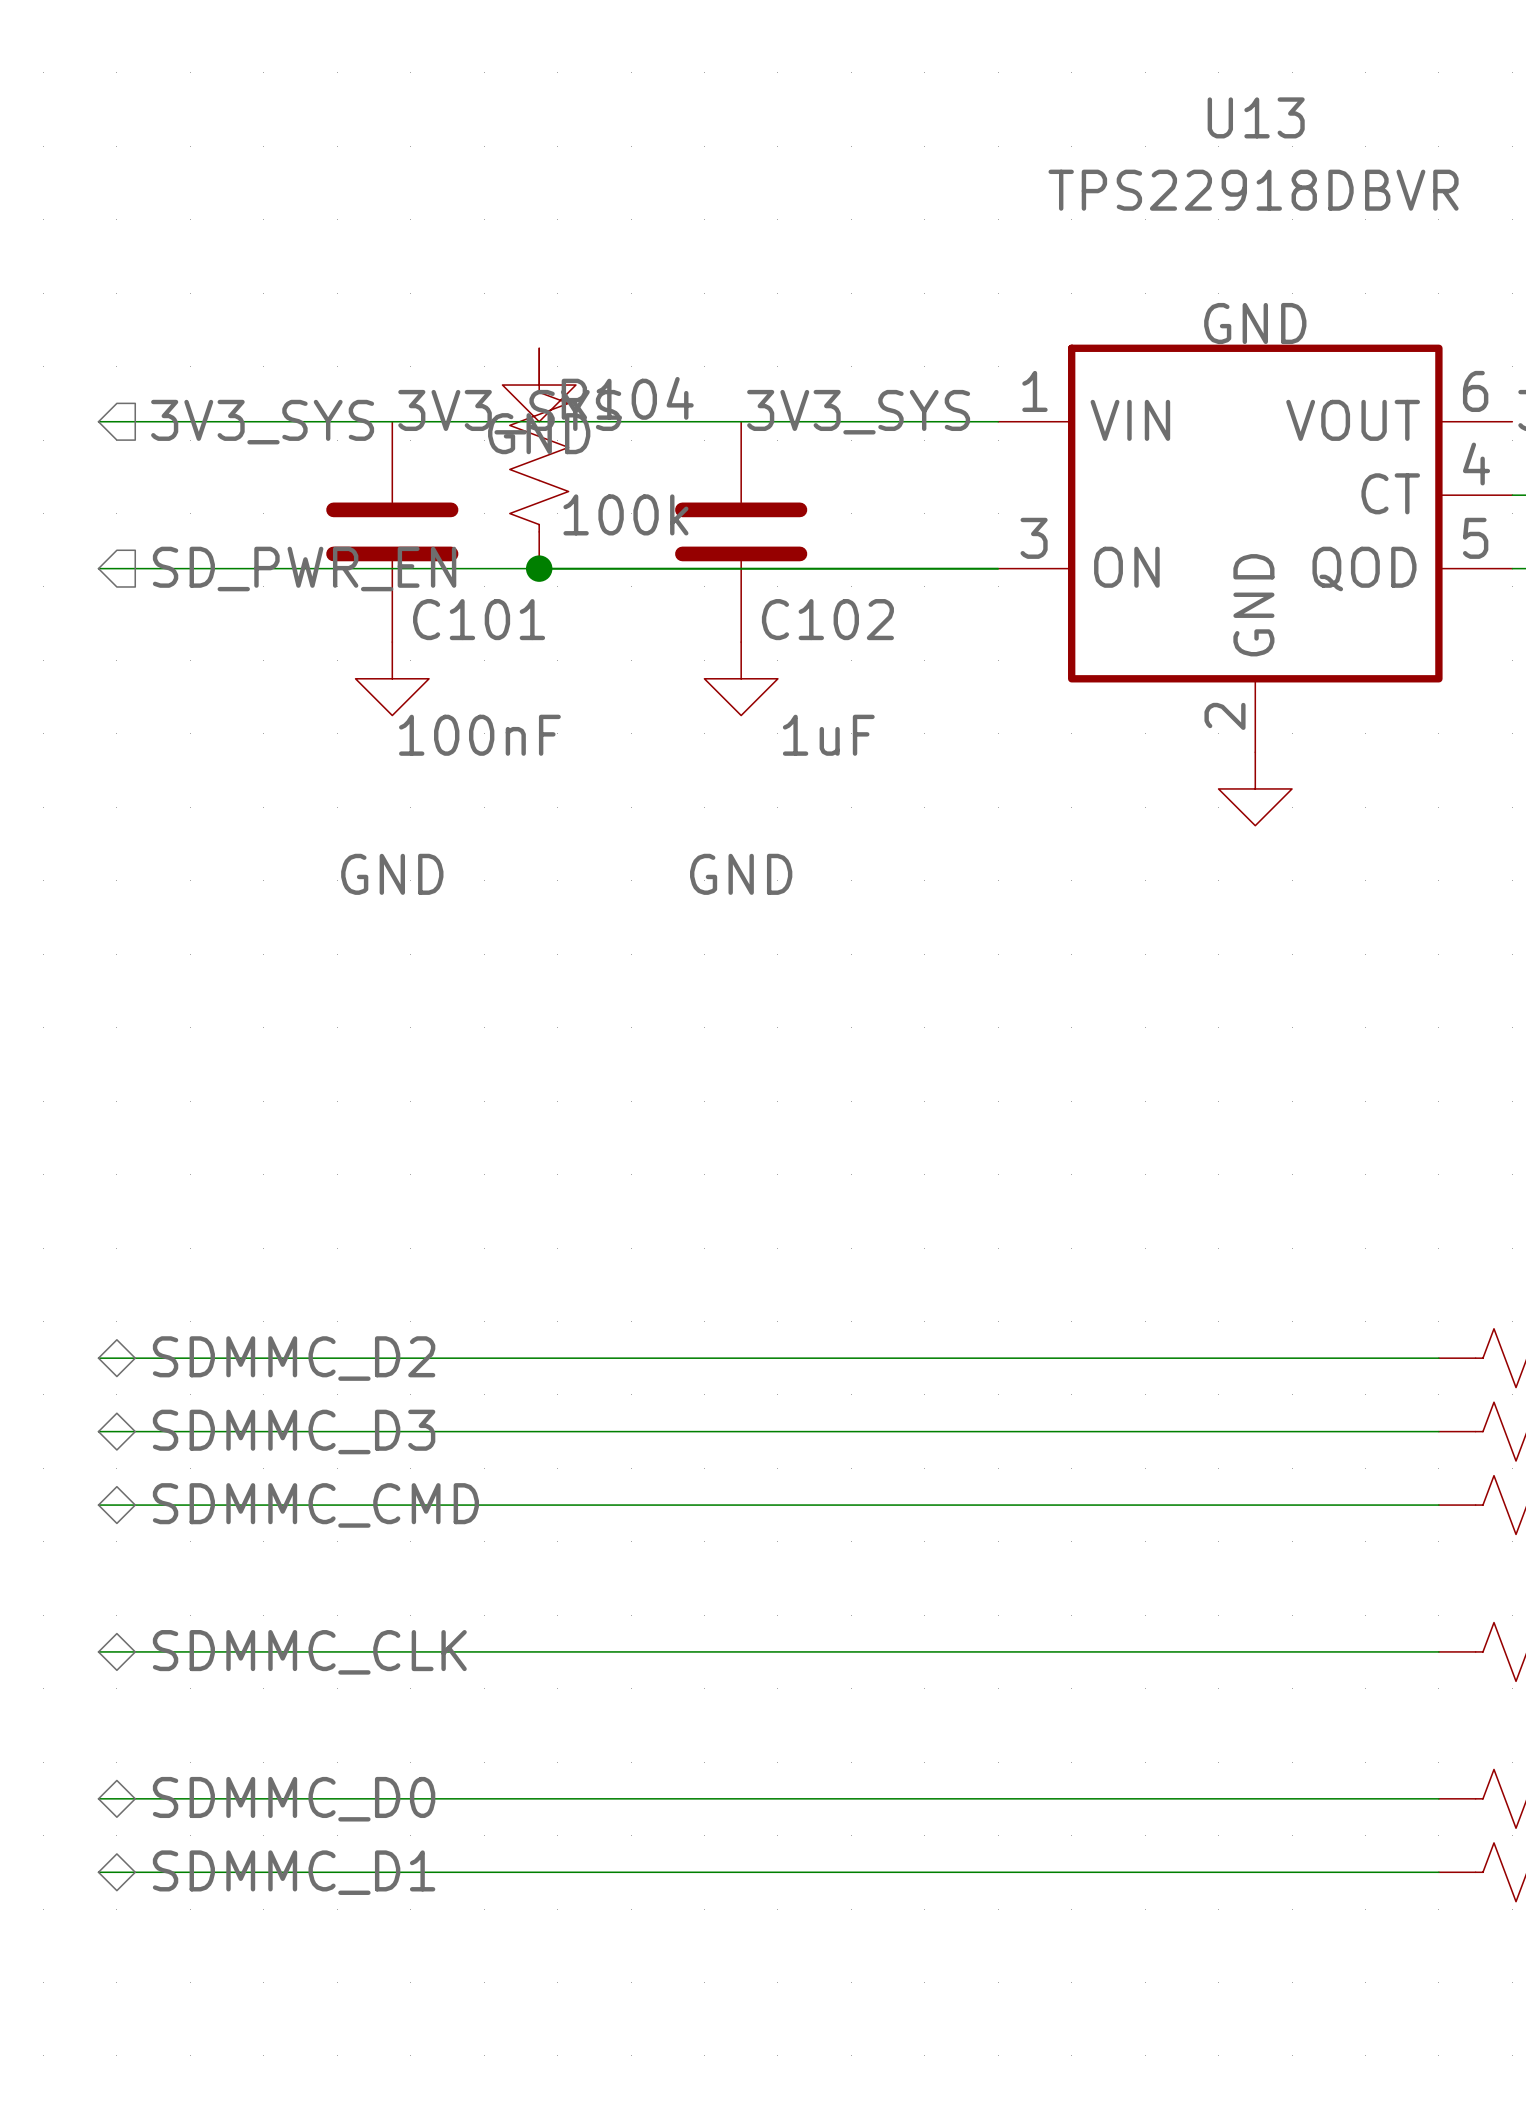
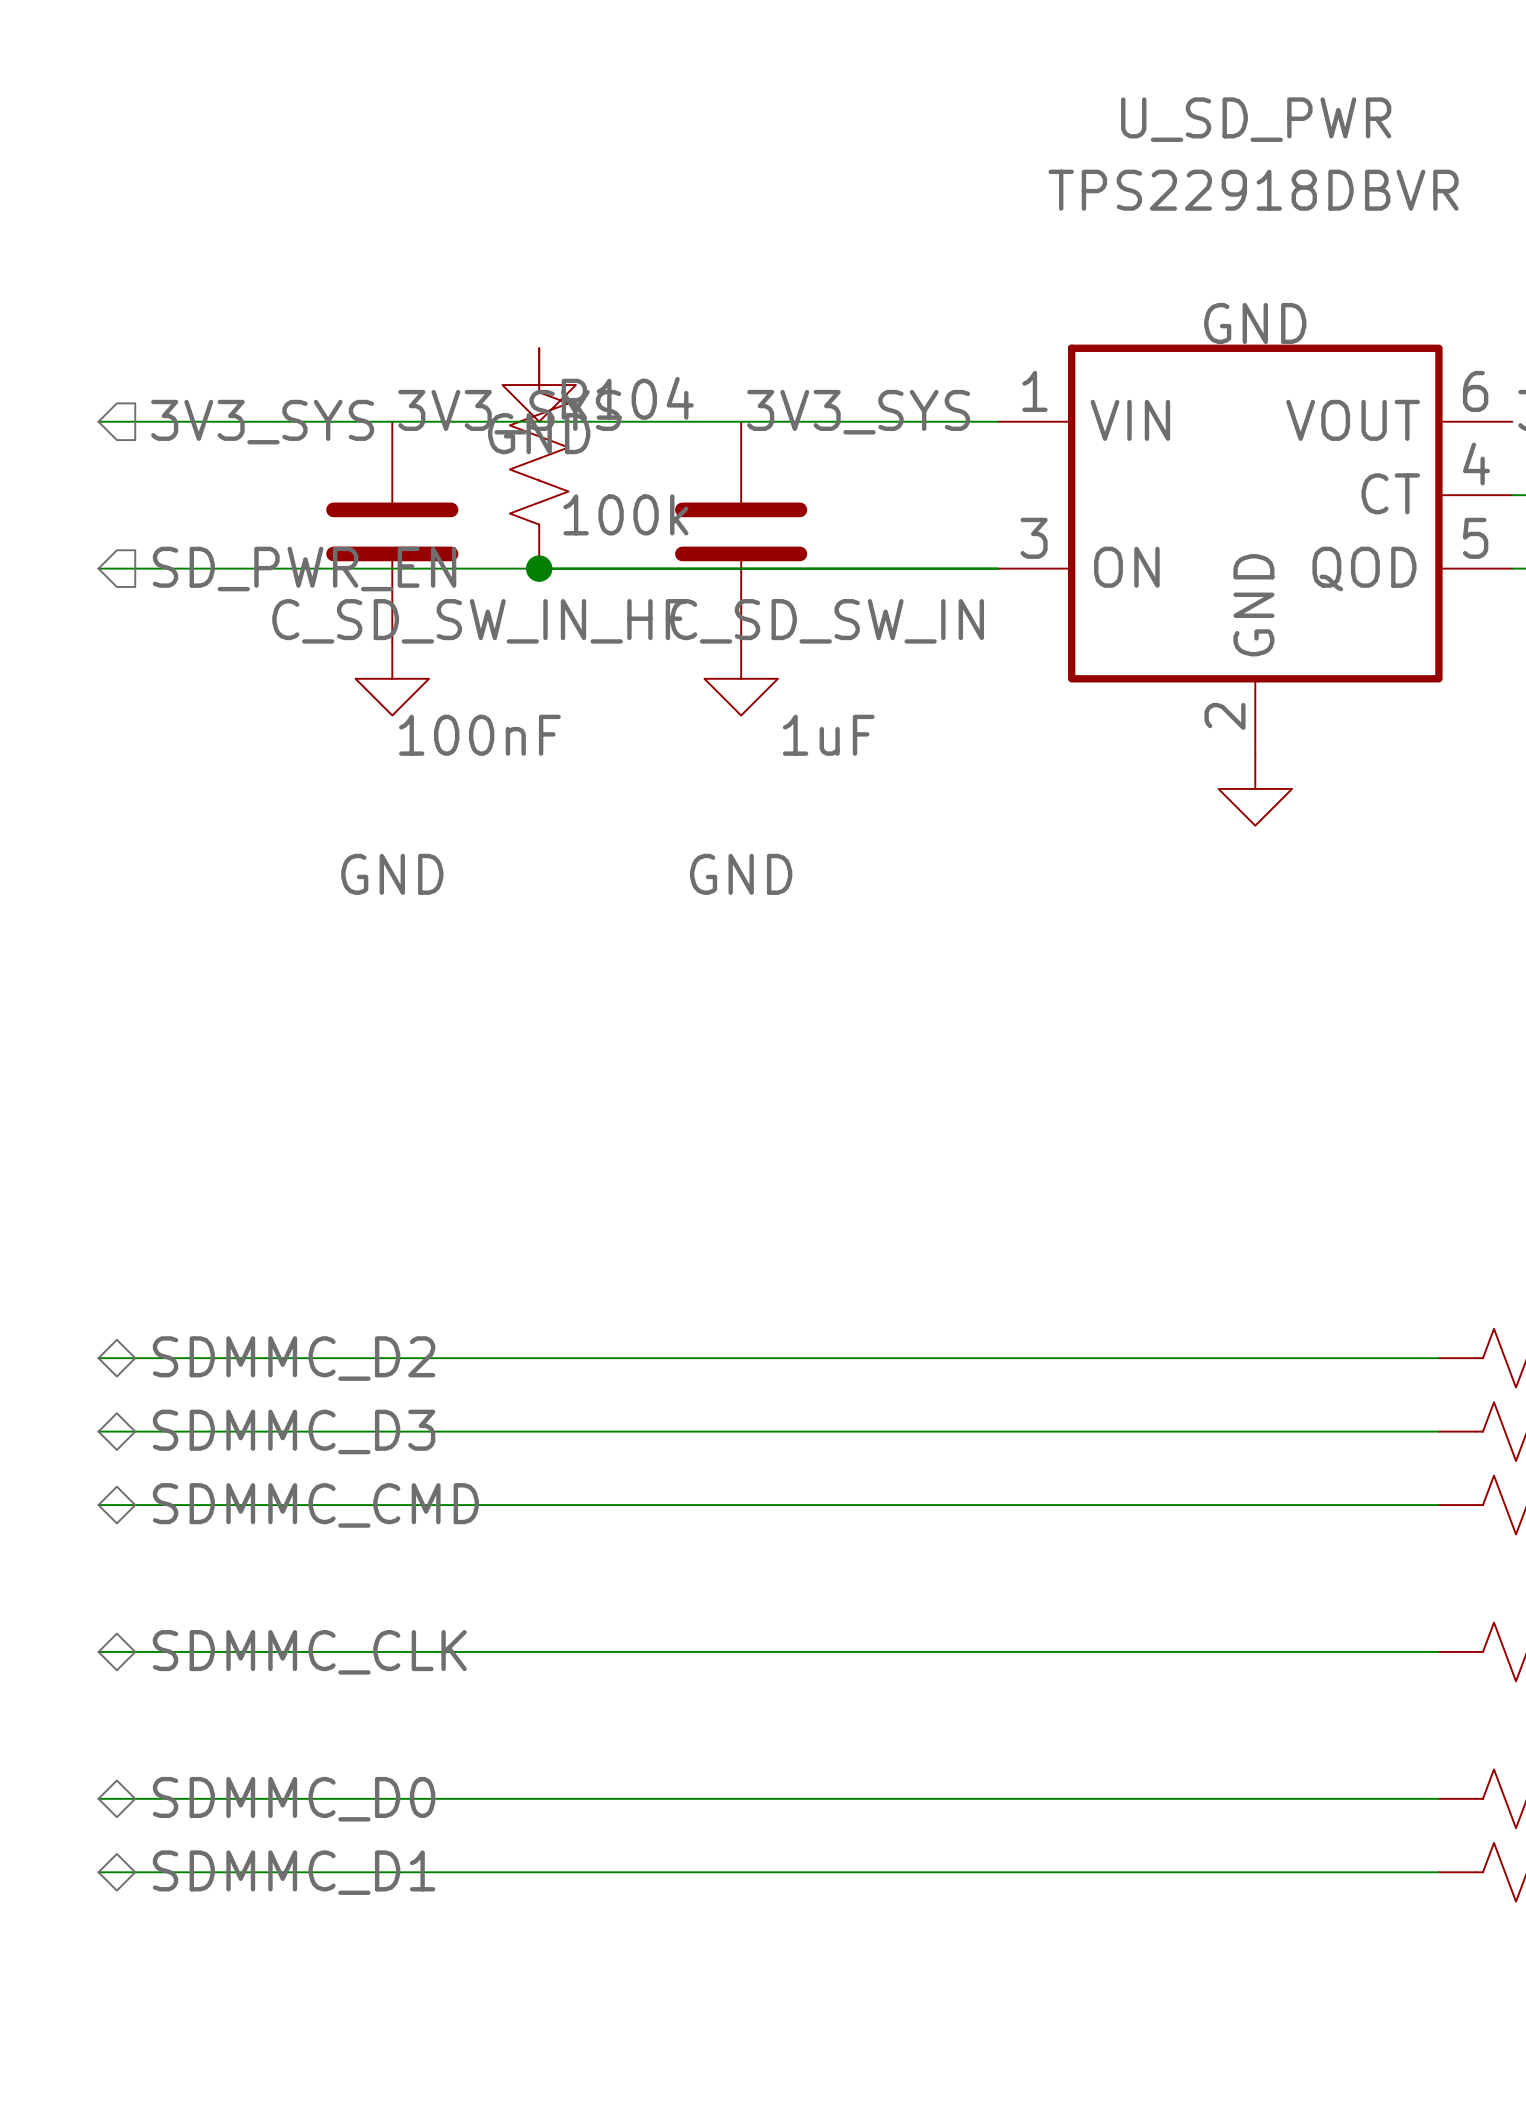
U13 name: U13 (1256, 117) -> U_SD_PWR (1256, 119)
C101 name: C101 (479, 619) -> C_SD_SW_IN_HF (479, 621)
C102 name: C102 (827, 619) -> C_SD_SW_IN (827, 621)

